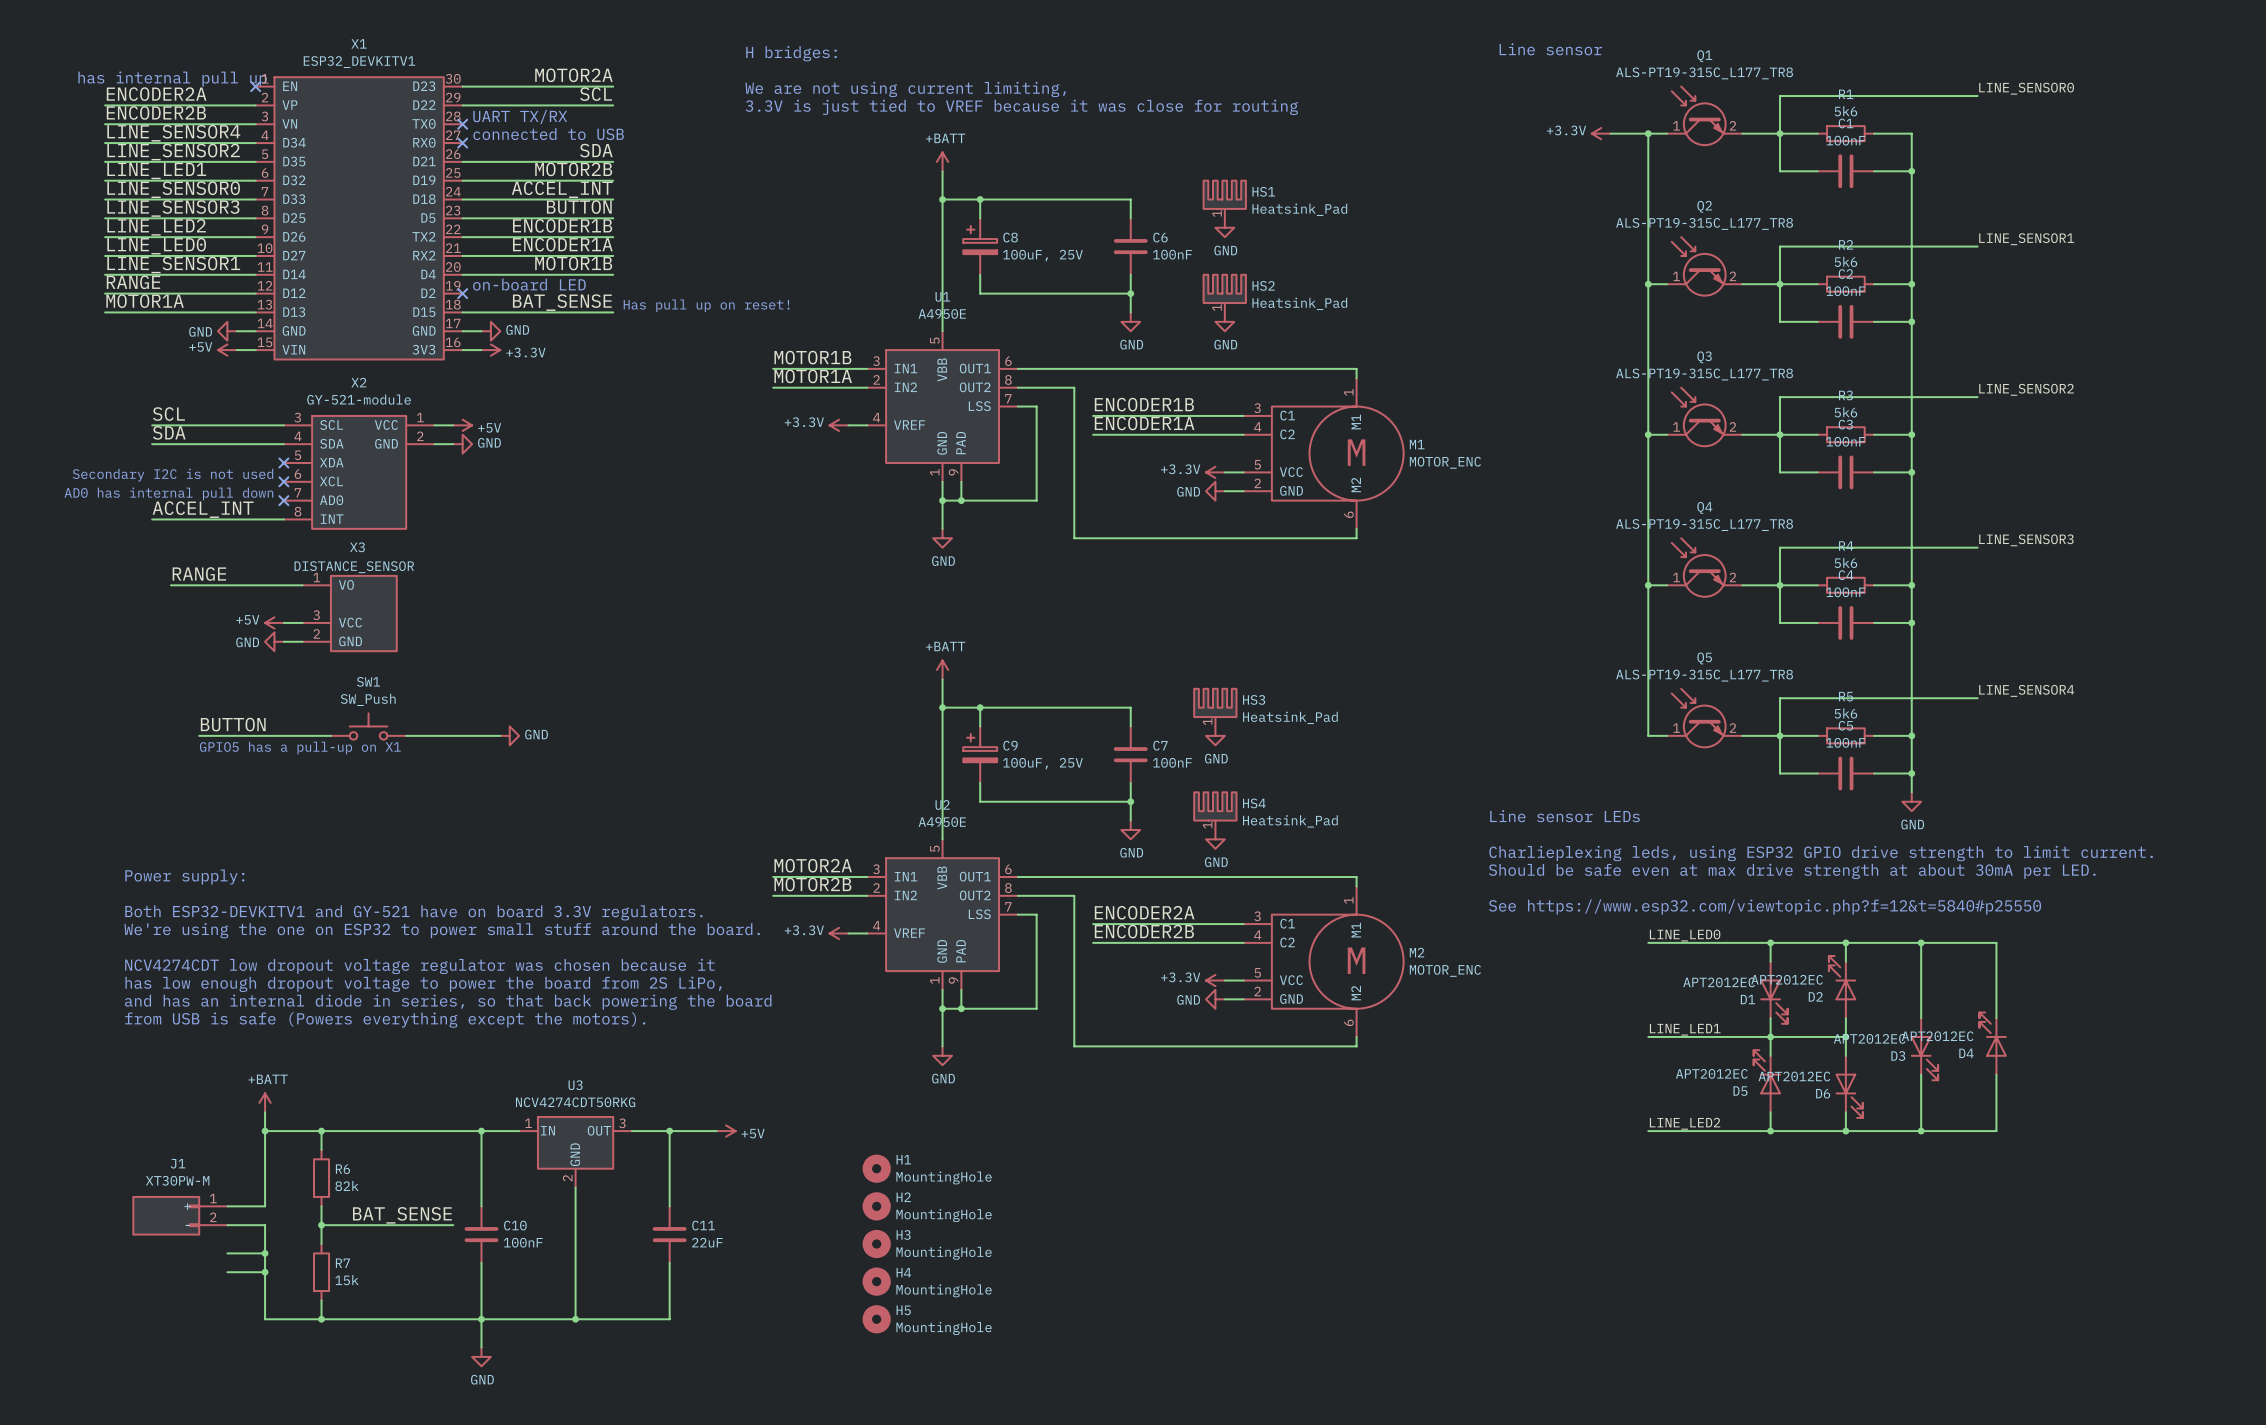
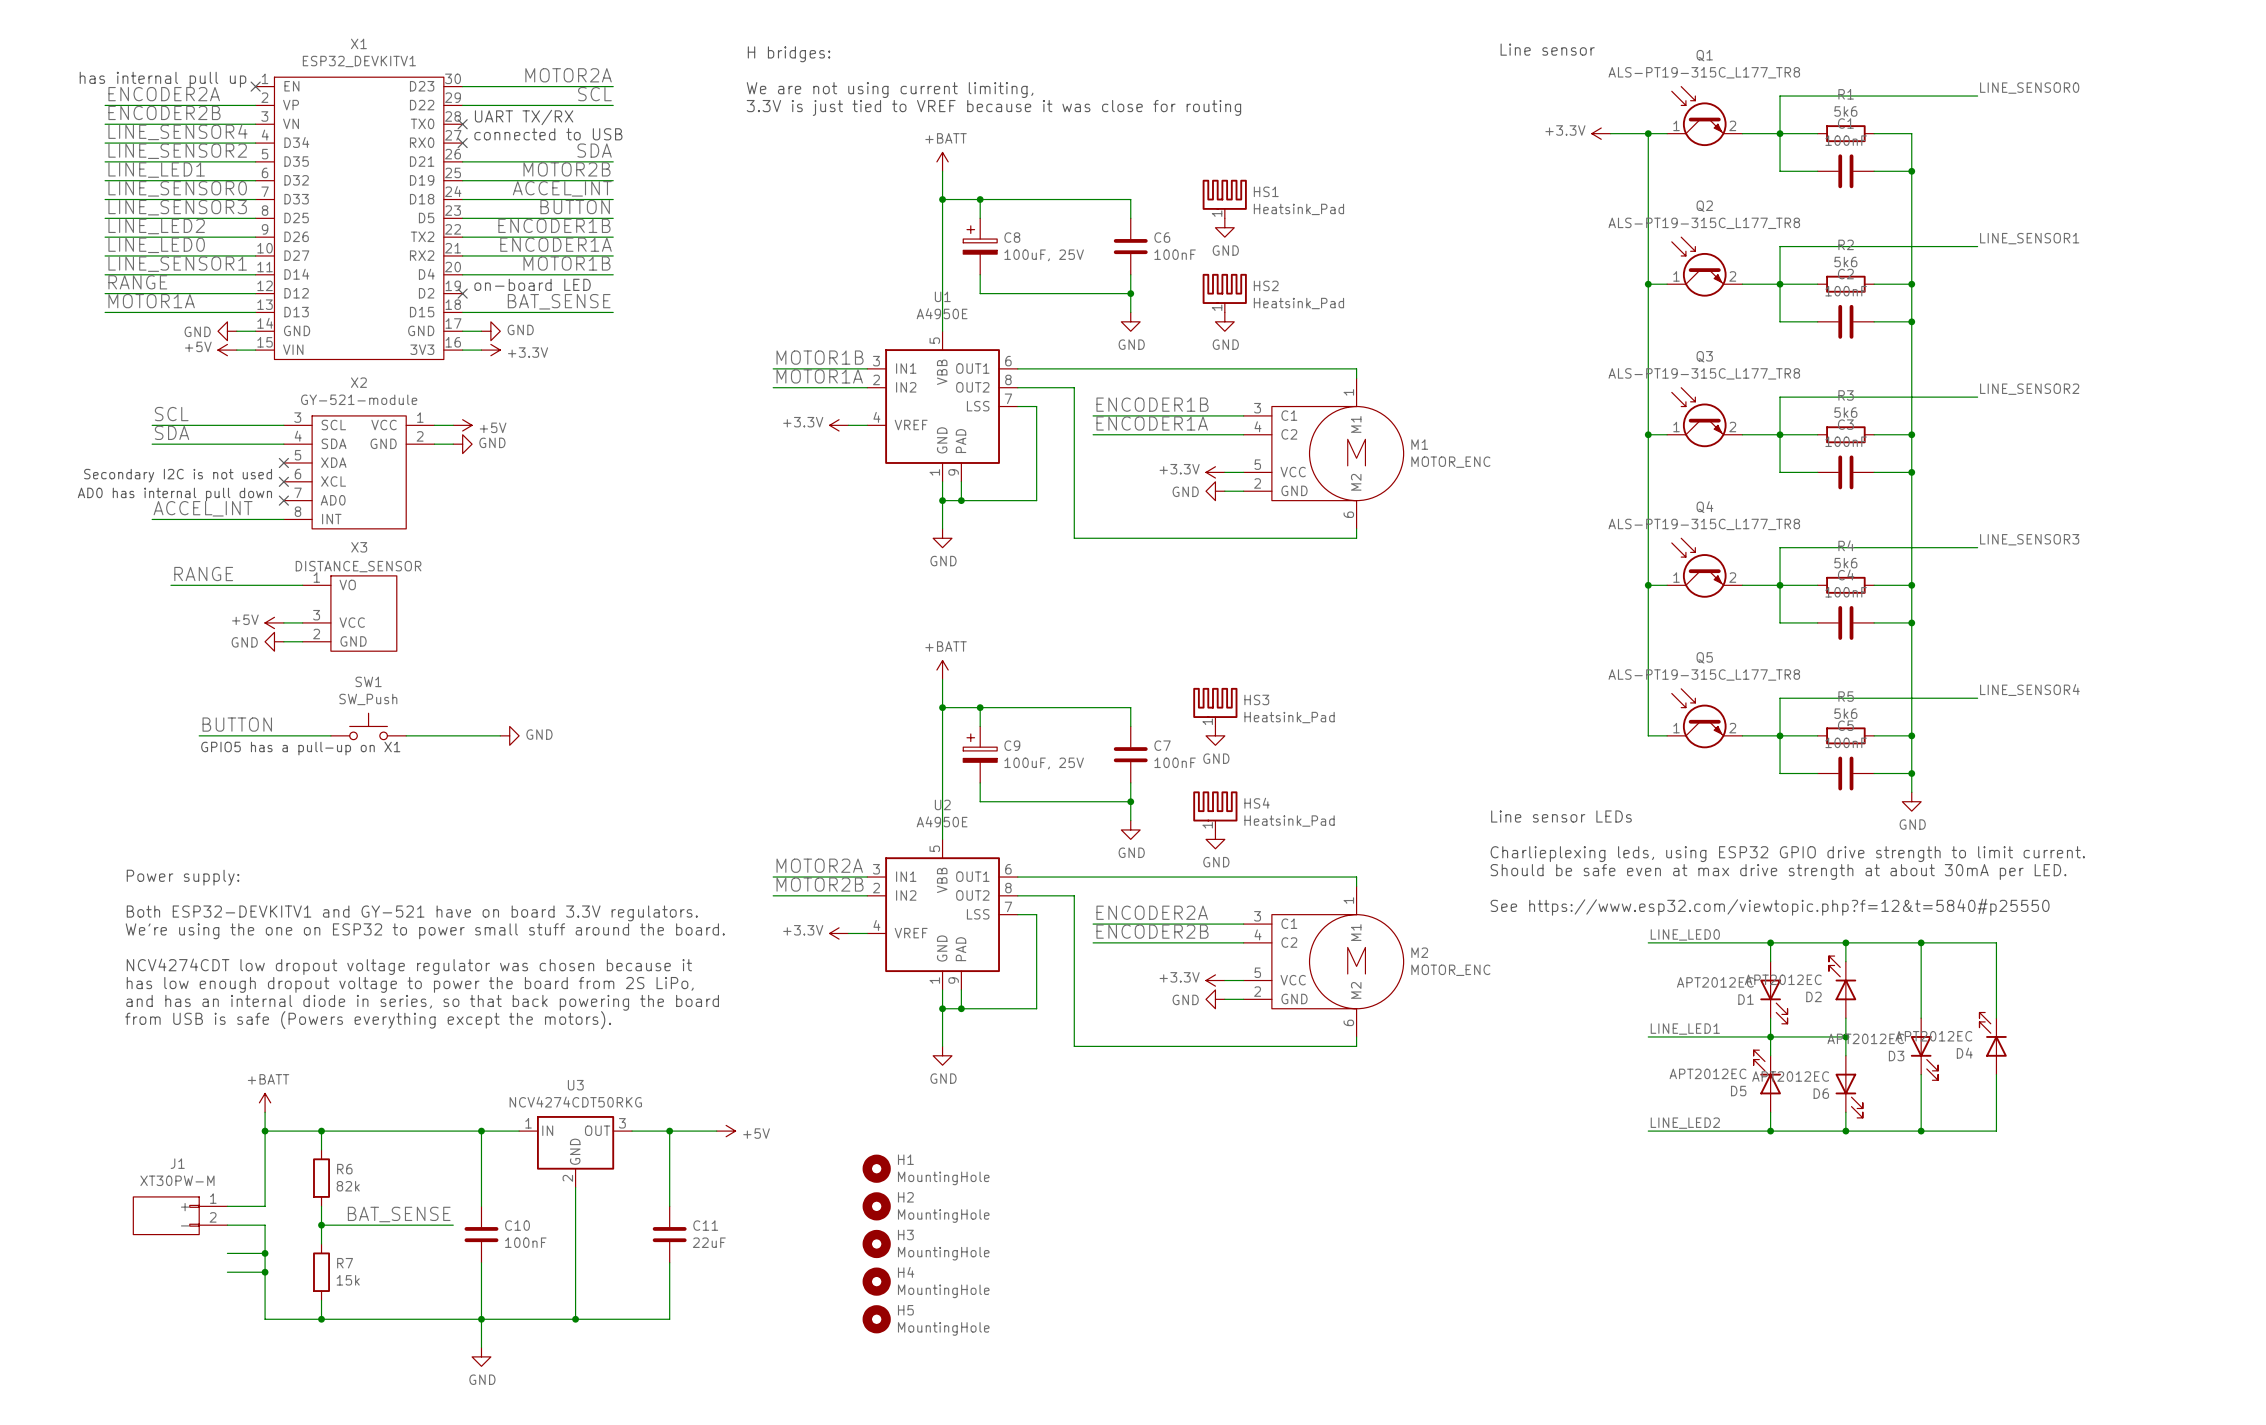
text: Has pull up on reset! (706, 305) -> none

